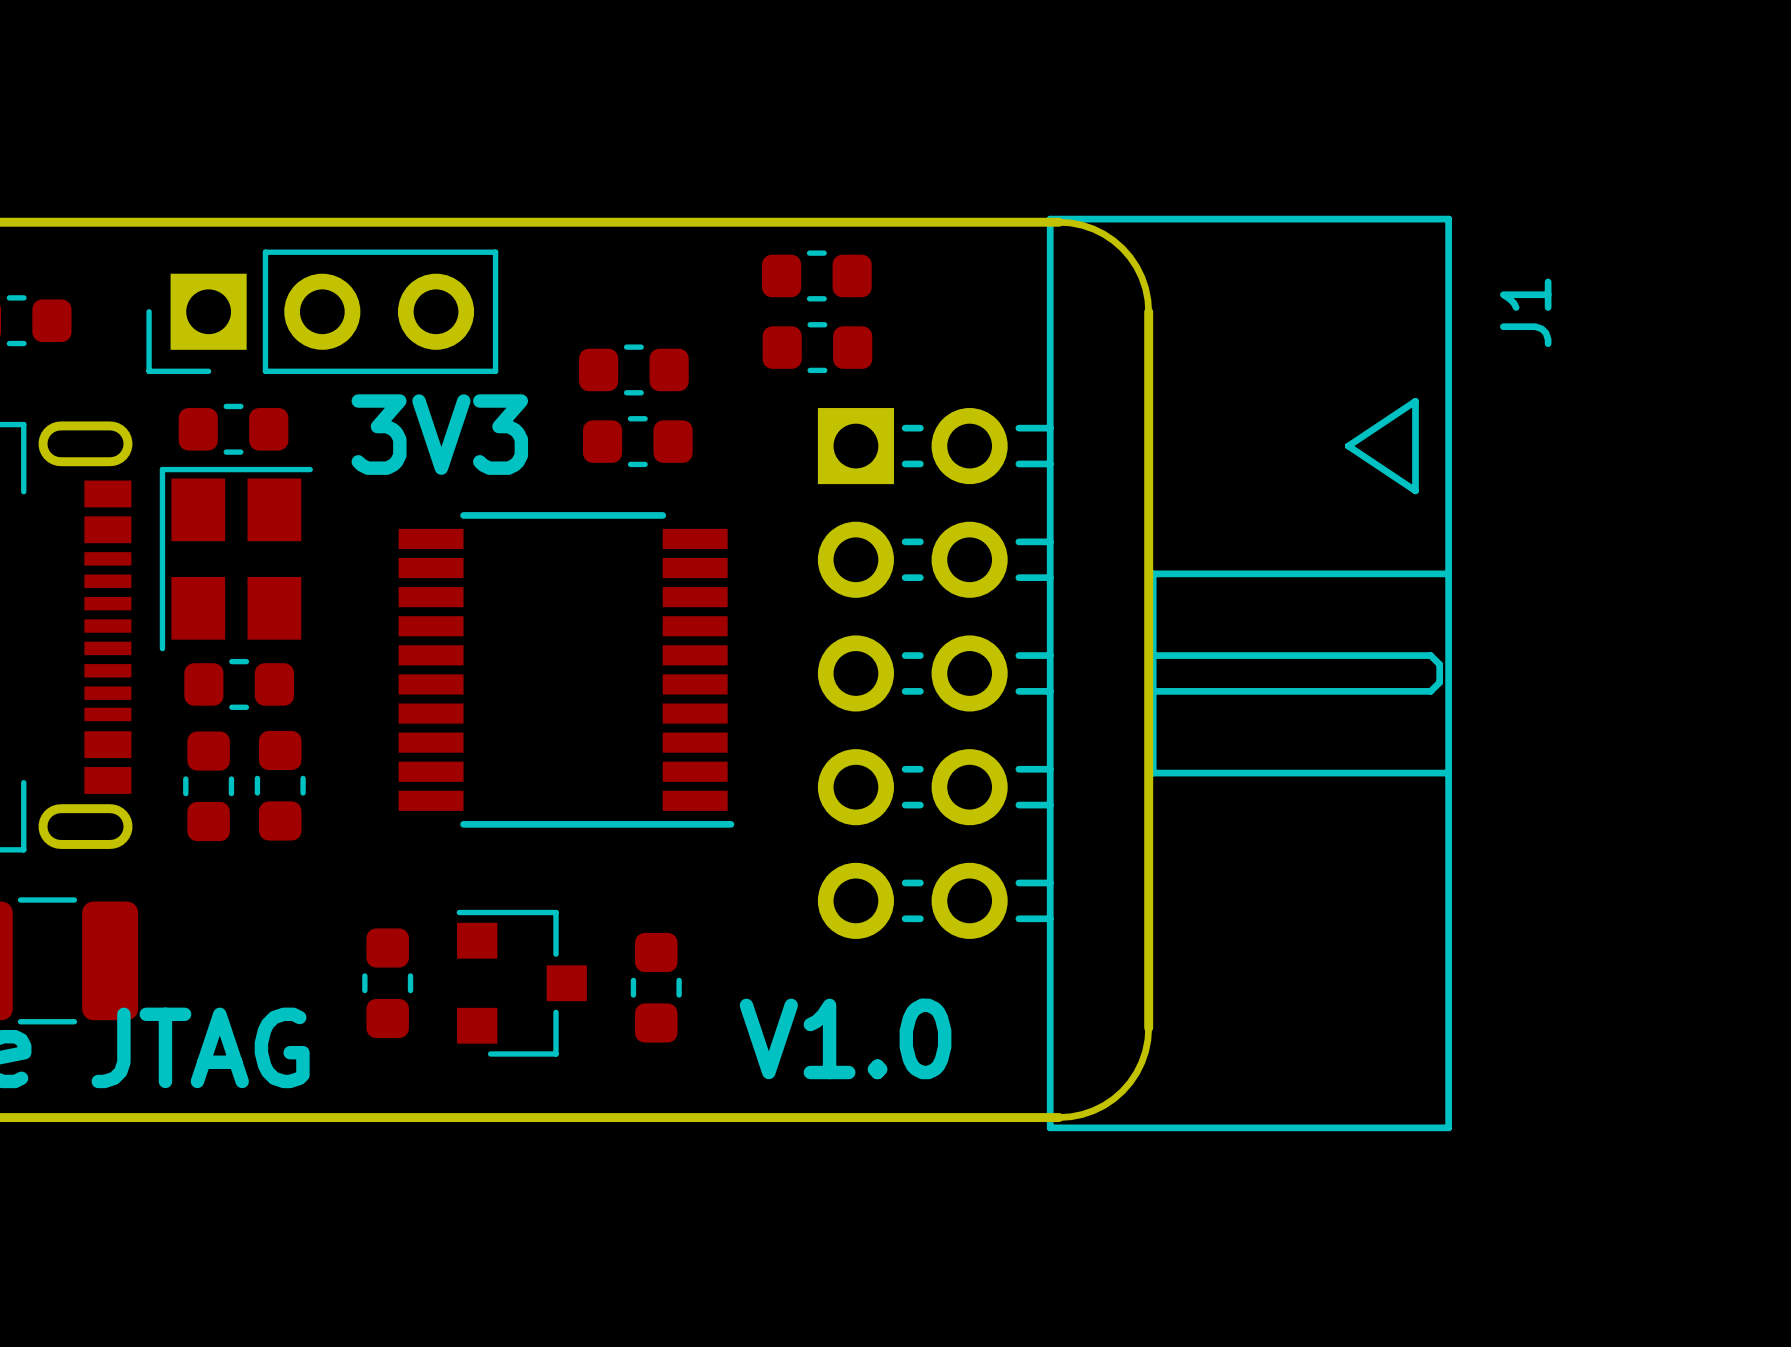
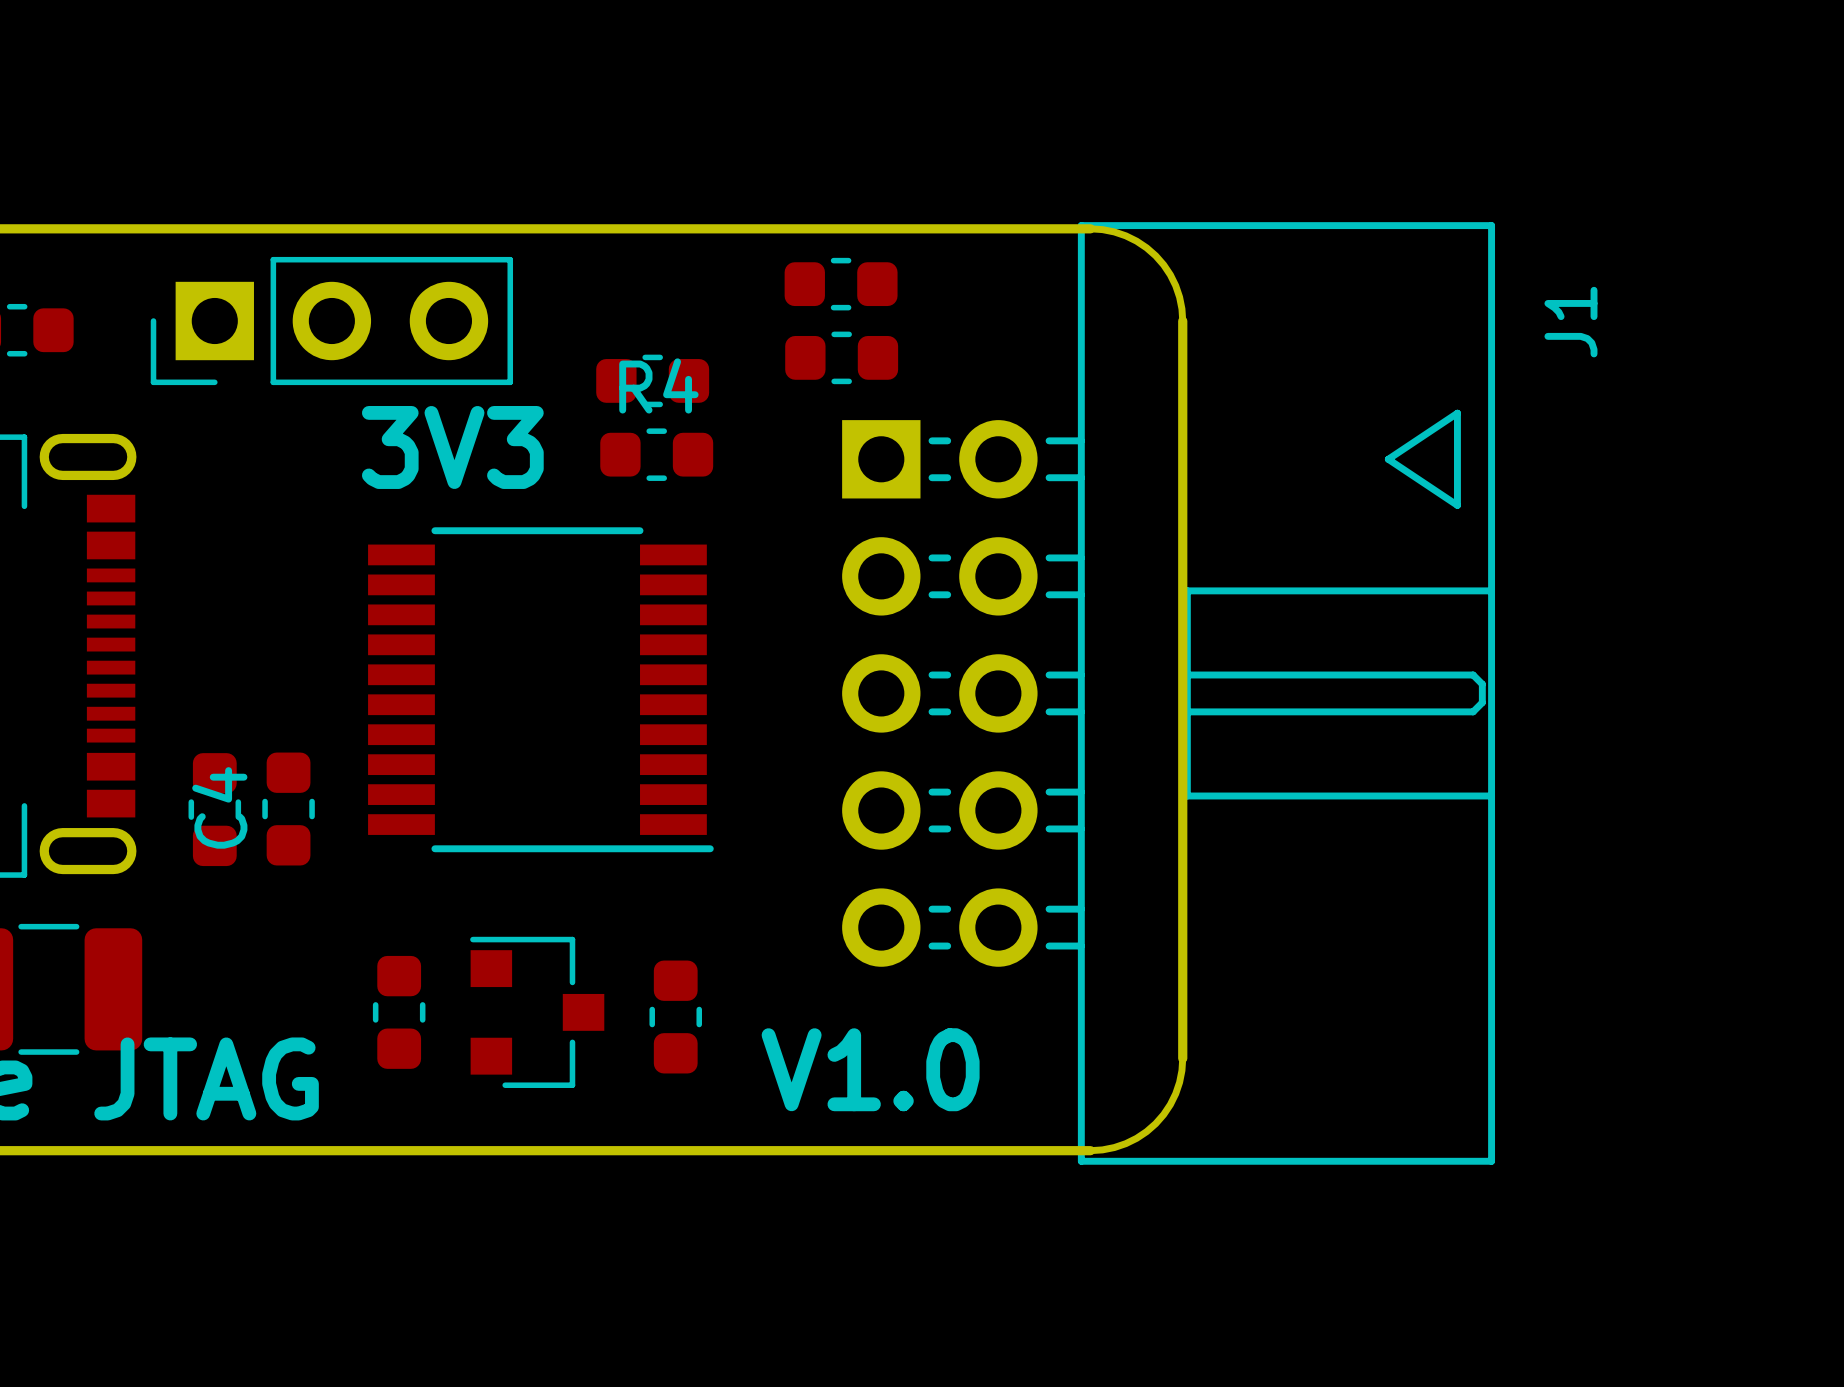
R4 name: none -> R4 (658, 385)
part: (233, 429) -> none
part: (236, 559) -> none
part position: (566, 669) -> (540, 689)
part: (239, 684) -> none
C4 name: none -> C4 (219, 807)

